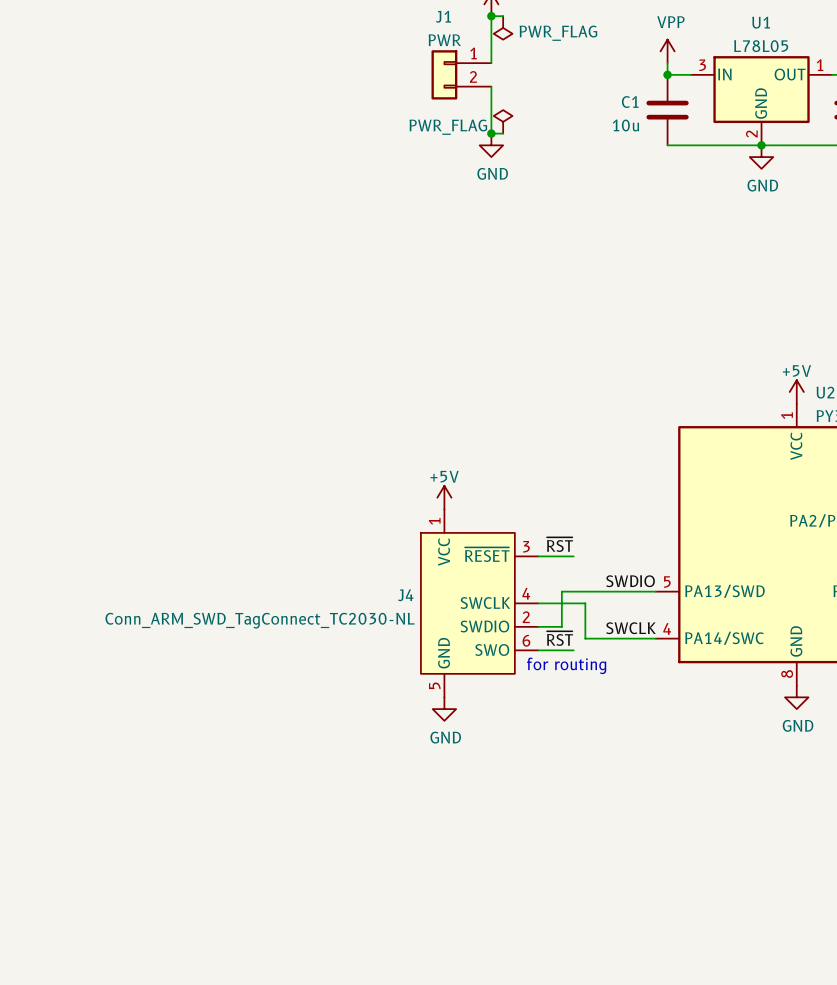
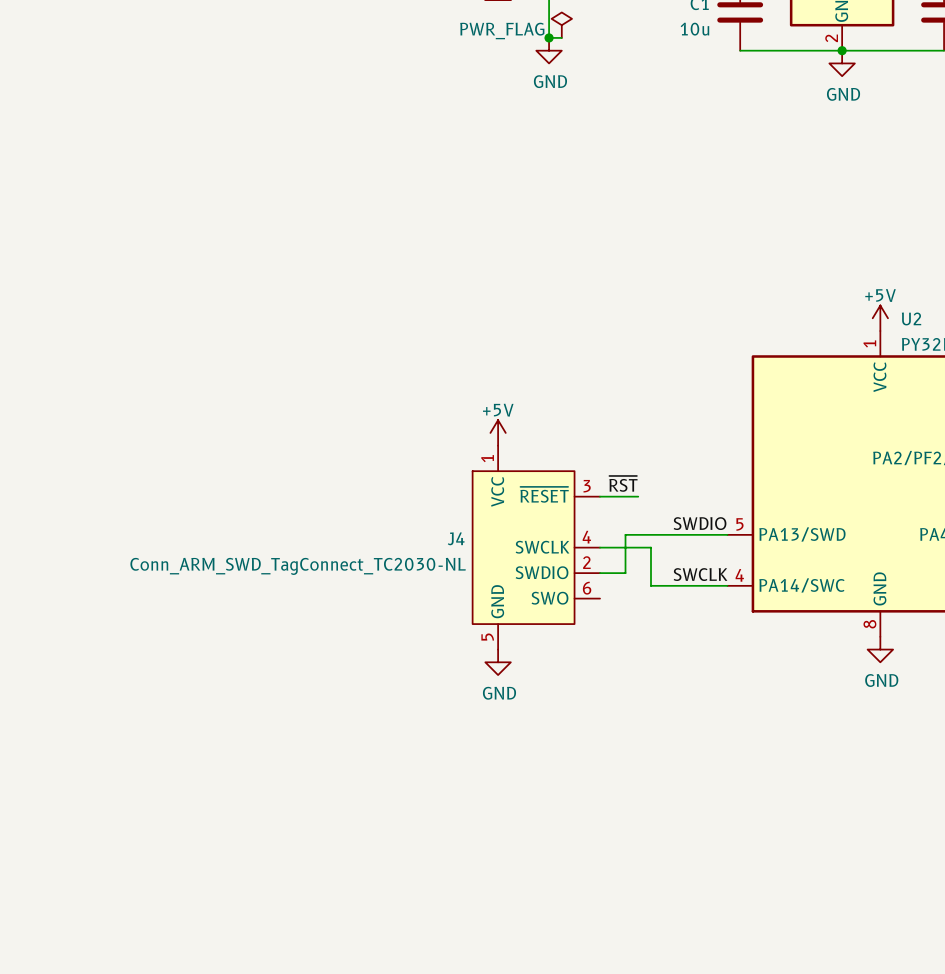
label: ~{RST} (559, 638) -> none
wire: (538, 650) (573, 650) -> none
text: for routing (566, 665) -> none

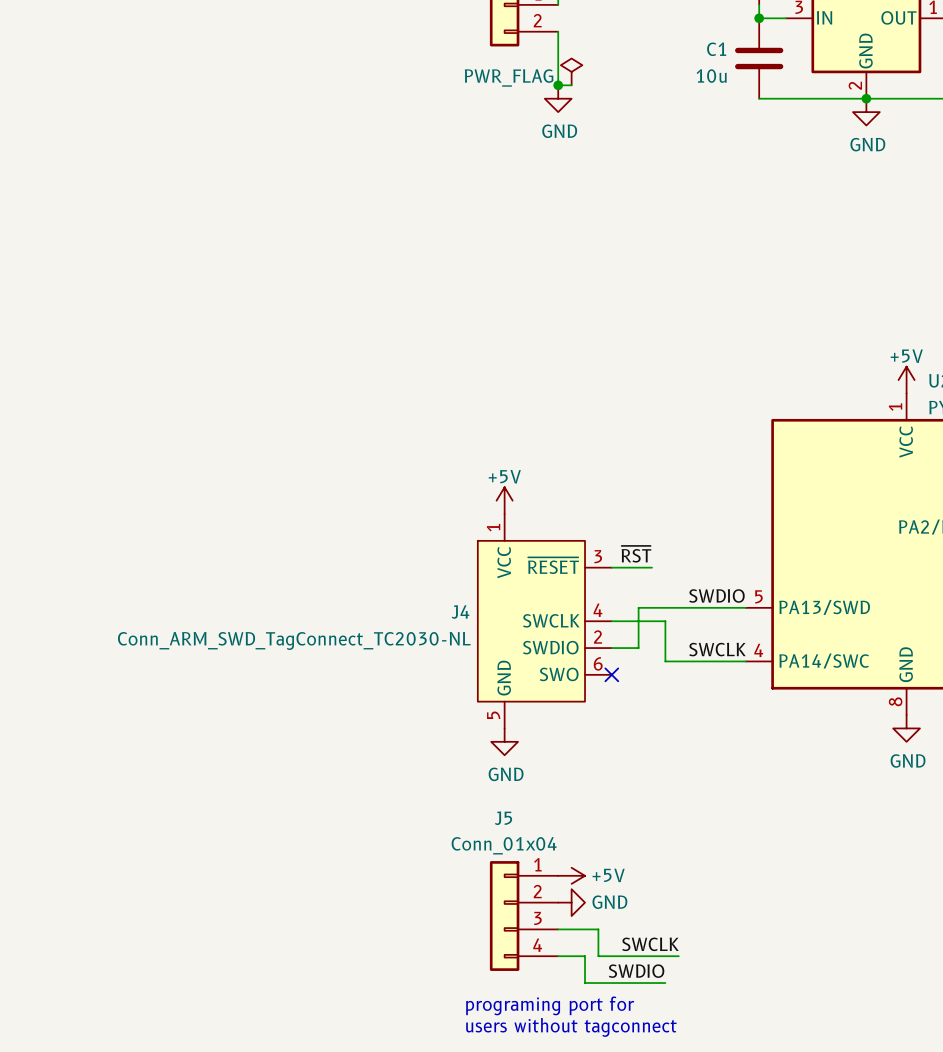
no-connect mark: none -> (611, 674)
power symbol: none -> +5V (571, 875)
power symbol: none -> GND (571, 902)
J5: none -> Conn_01x04 (524, 916)
wire: none -> (558, 929) (598, 929) (598, 956) (678, 956)
label: none -> SWCLK (650, 944)
wire: none -> (558, 956) (585, 956) (585, 983) (665, 983)
label: none -> SWDIO (636, 971)
text: none -> programing port for (550, 1005)
text: none -> users without tagconnect (571, 1027)

